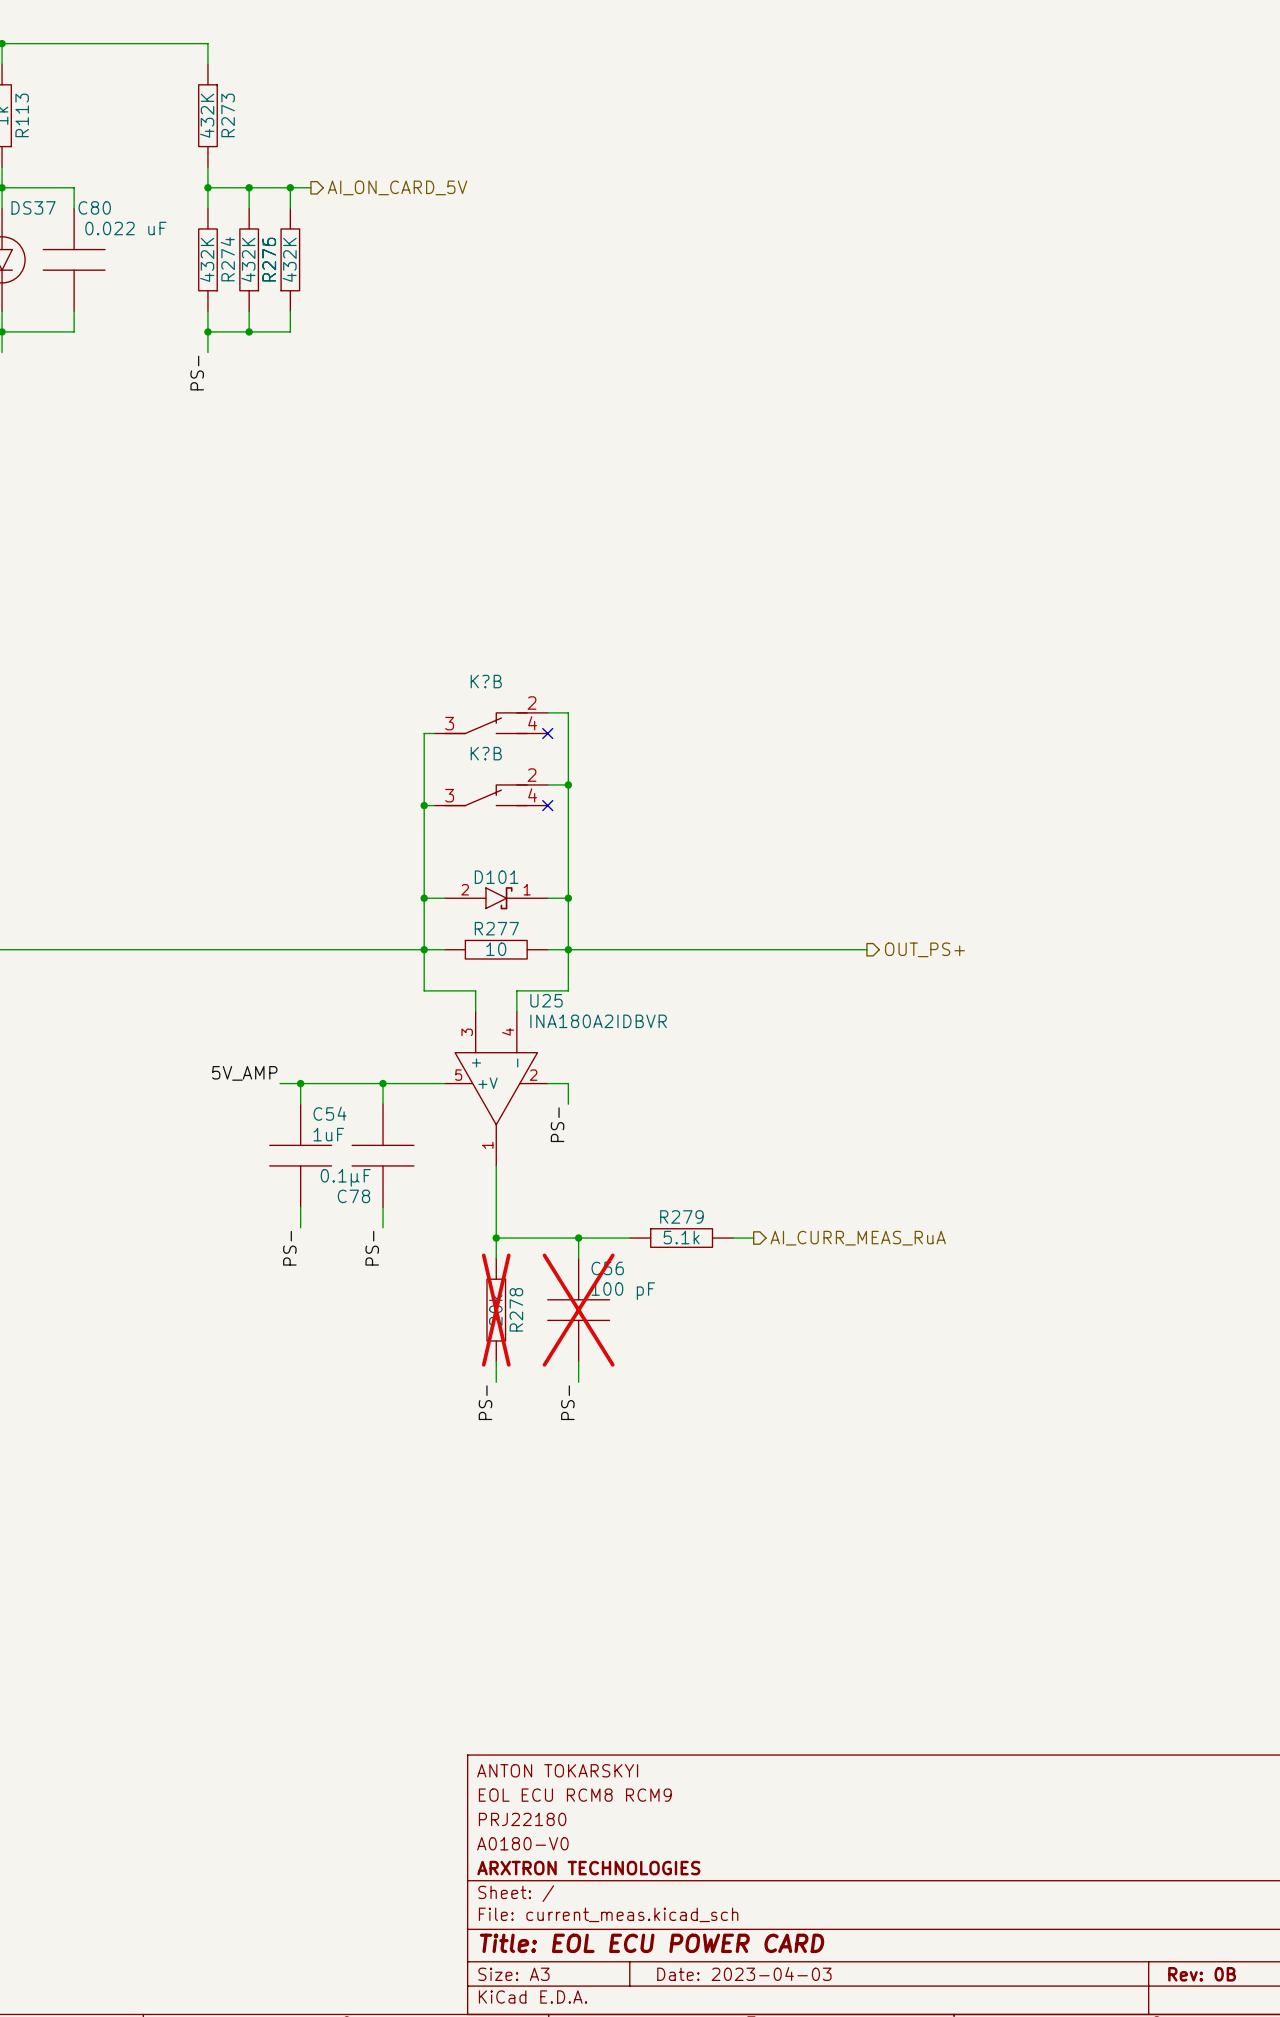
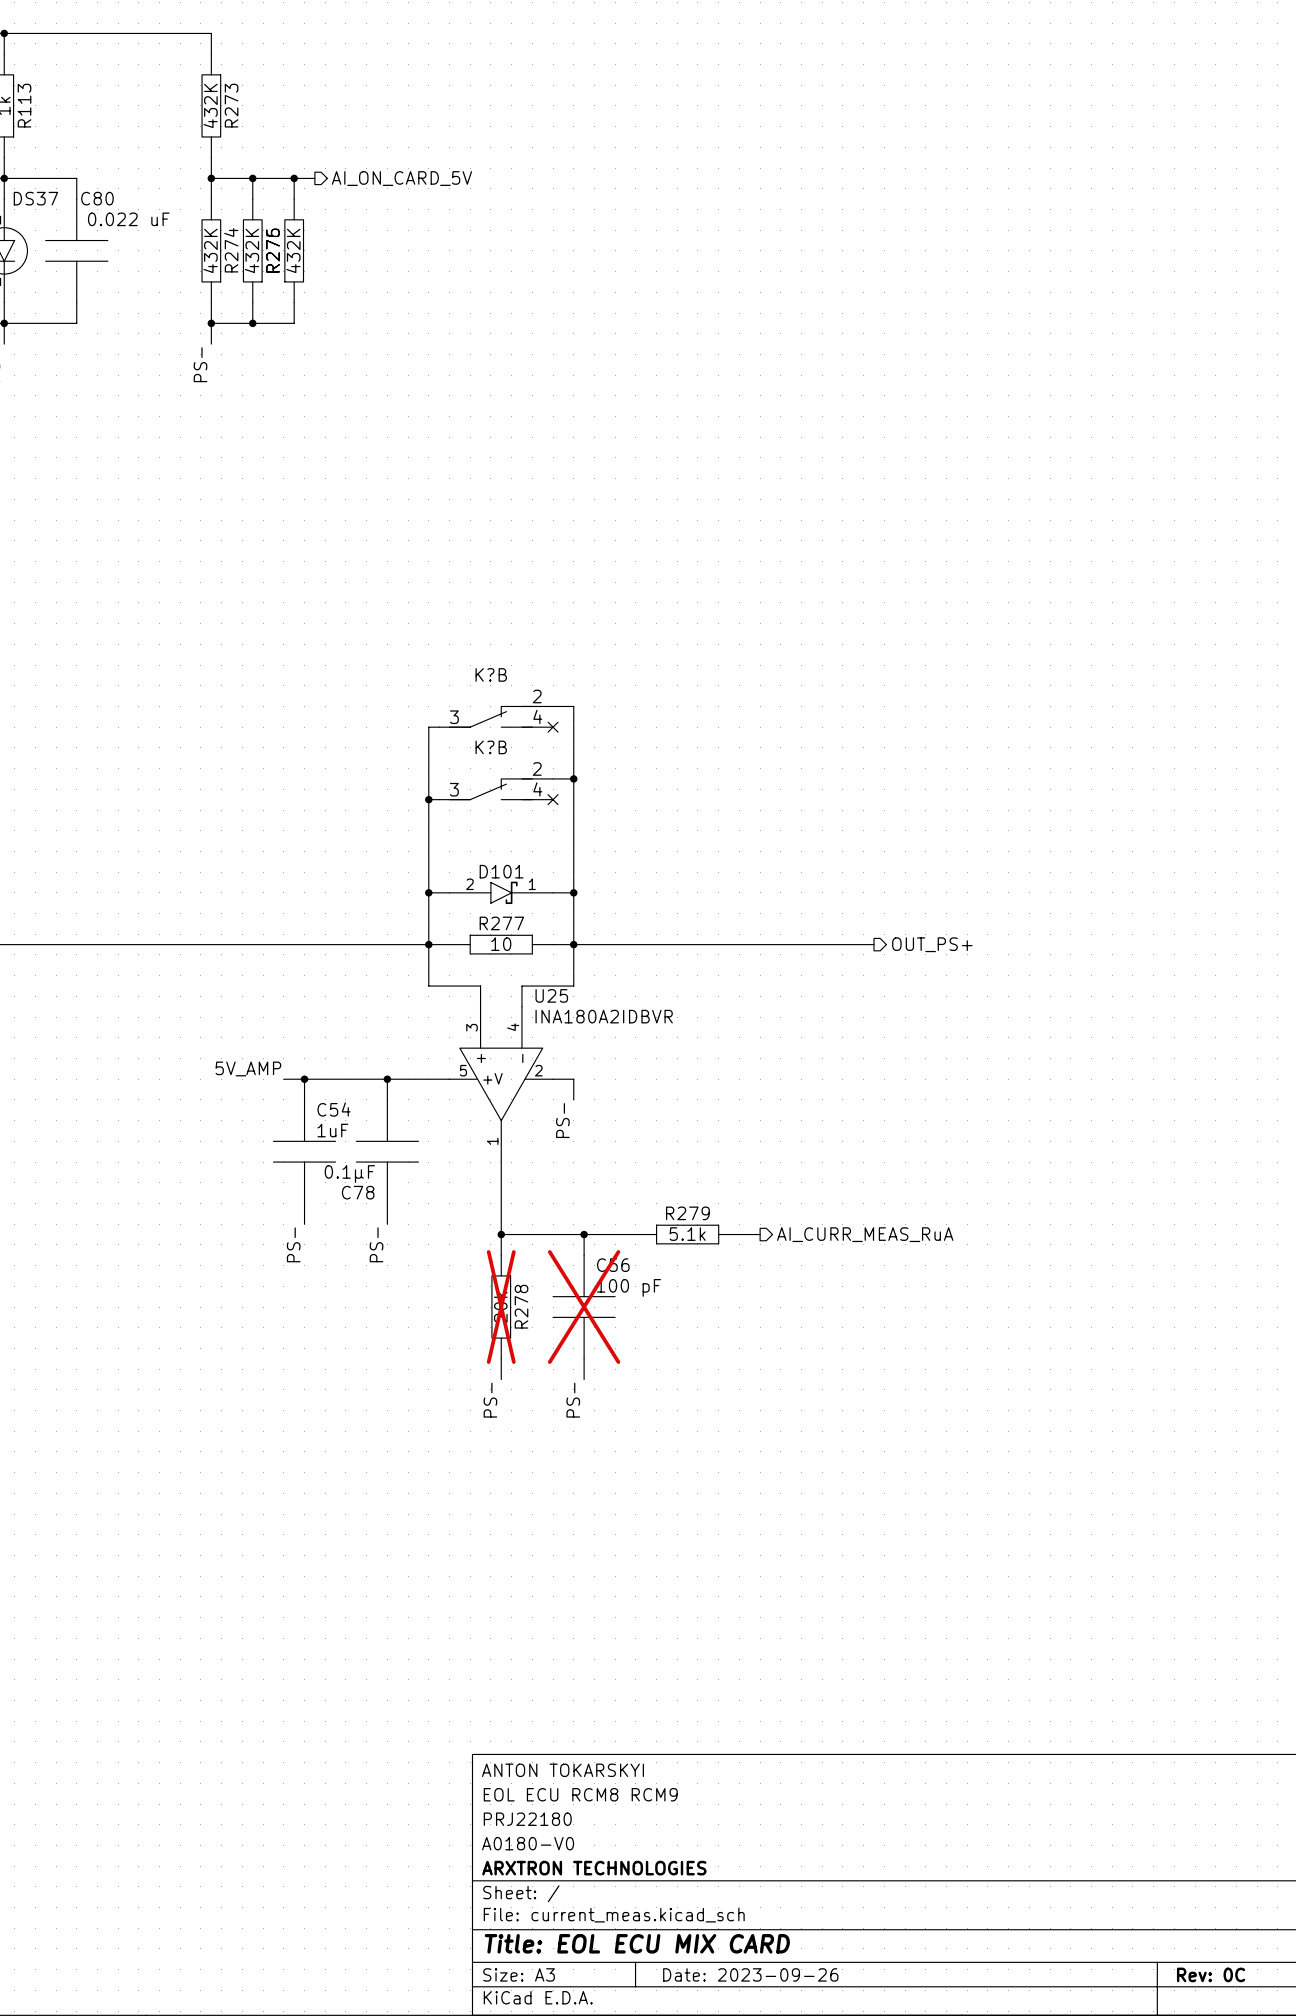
title block: Title: EOL ECU POWER CARD (652, 1943) -> Title: EOL ECU MIX CARD (637, 1943)
title block: Date: 2023-04-03 (744, 1974) -> Date: 2023-09-26 (750, 1974)
title block: Rev: 0B (1202, 1974) -> Rev: 0C (1211, 1974)

